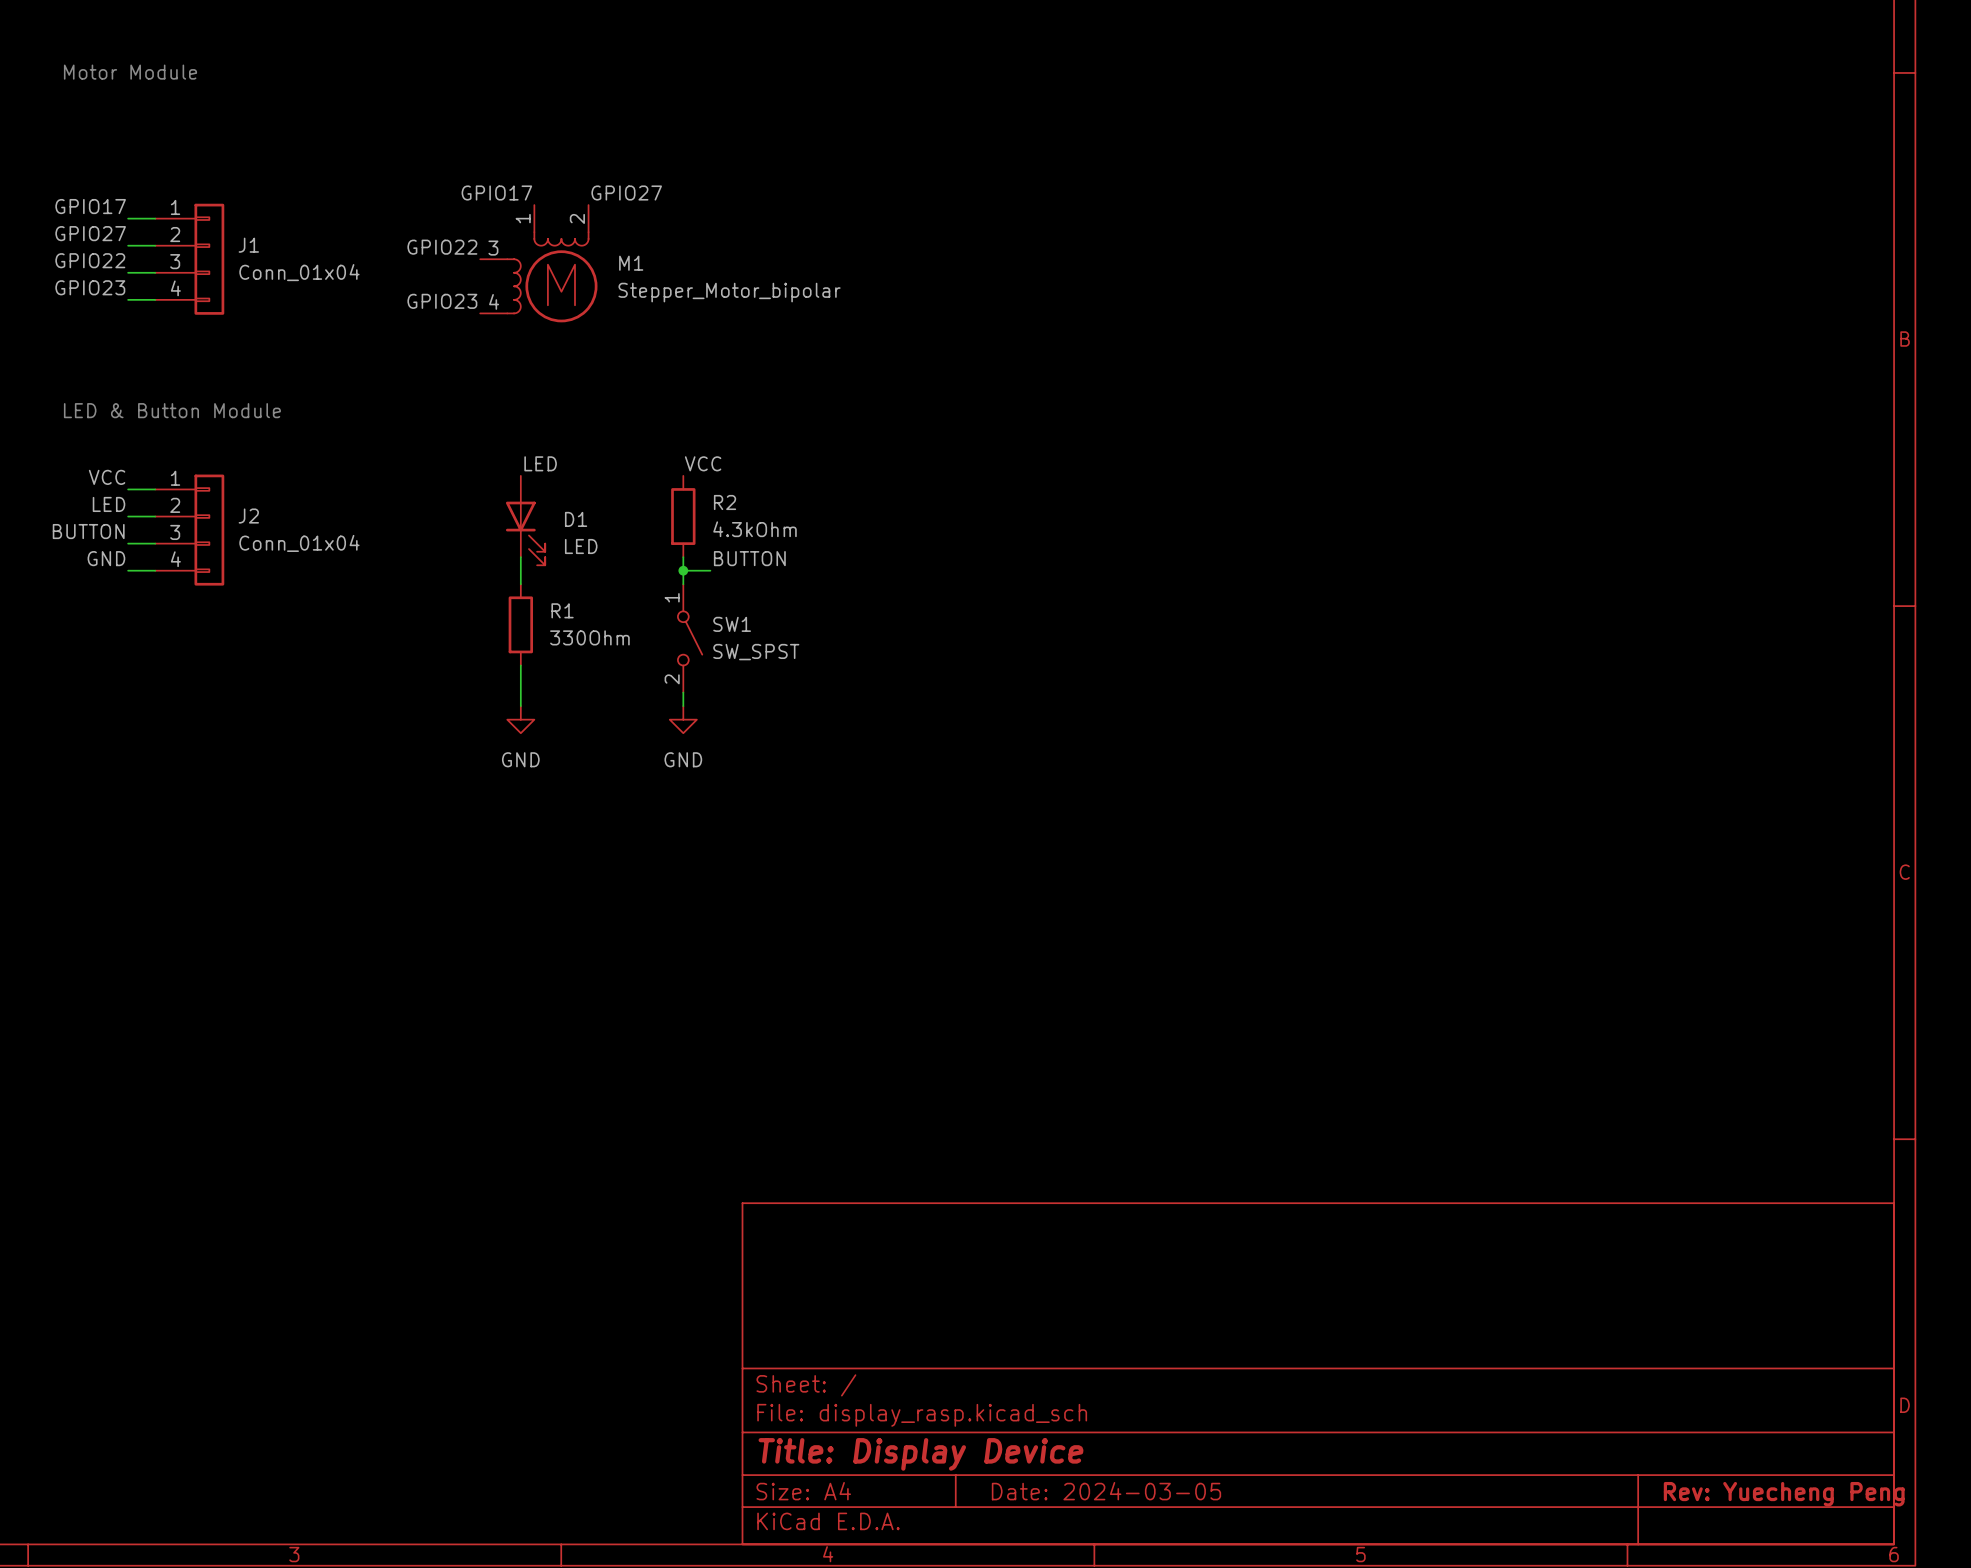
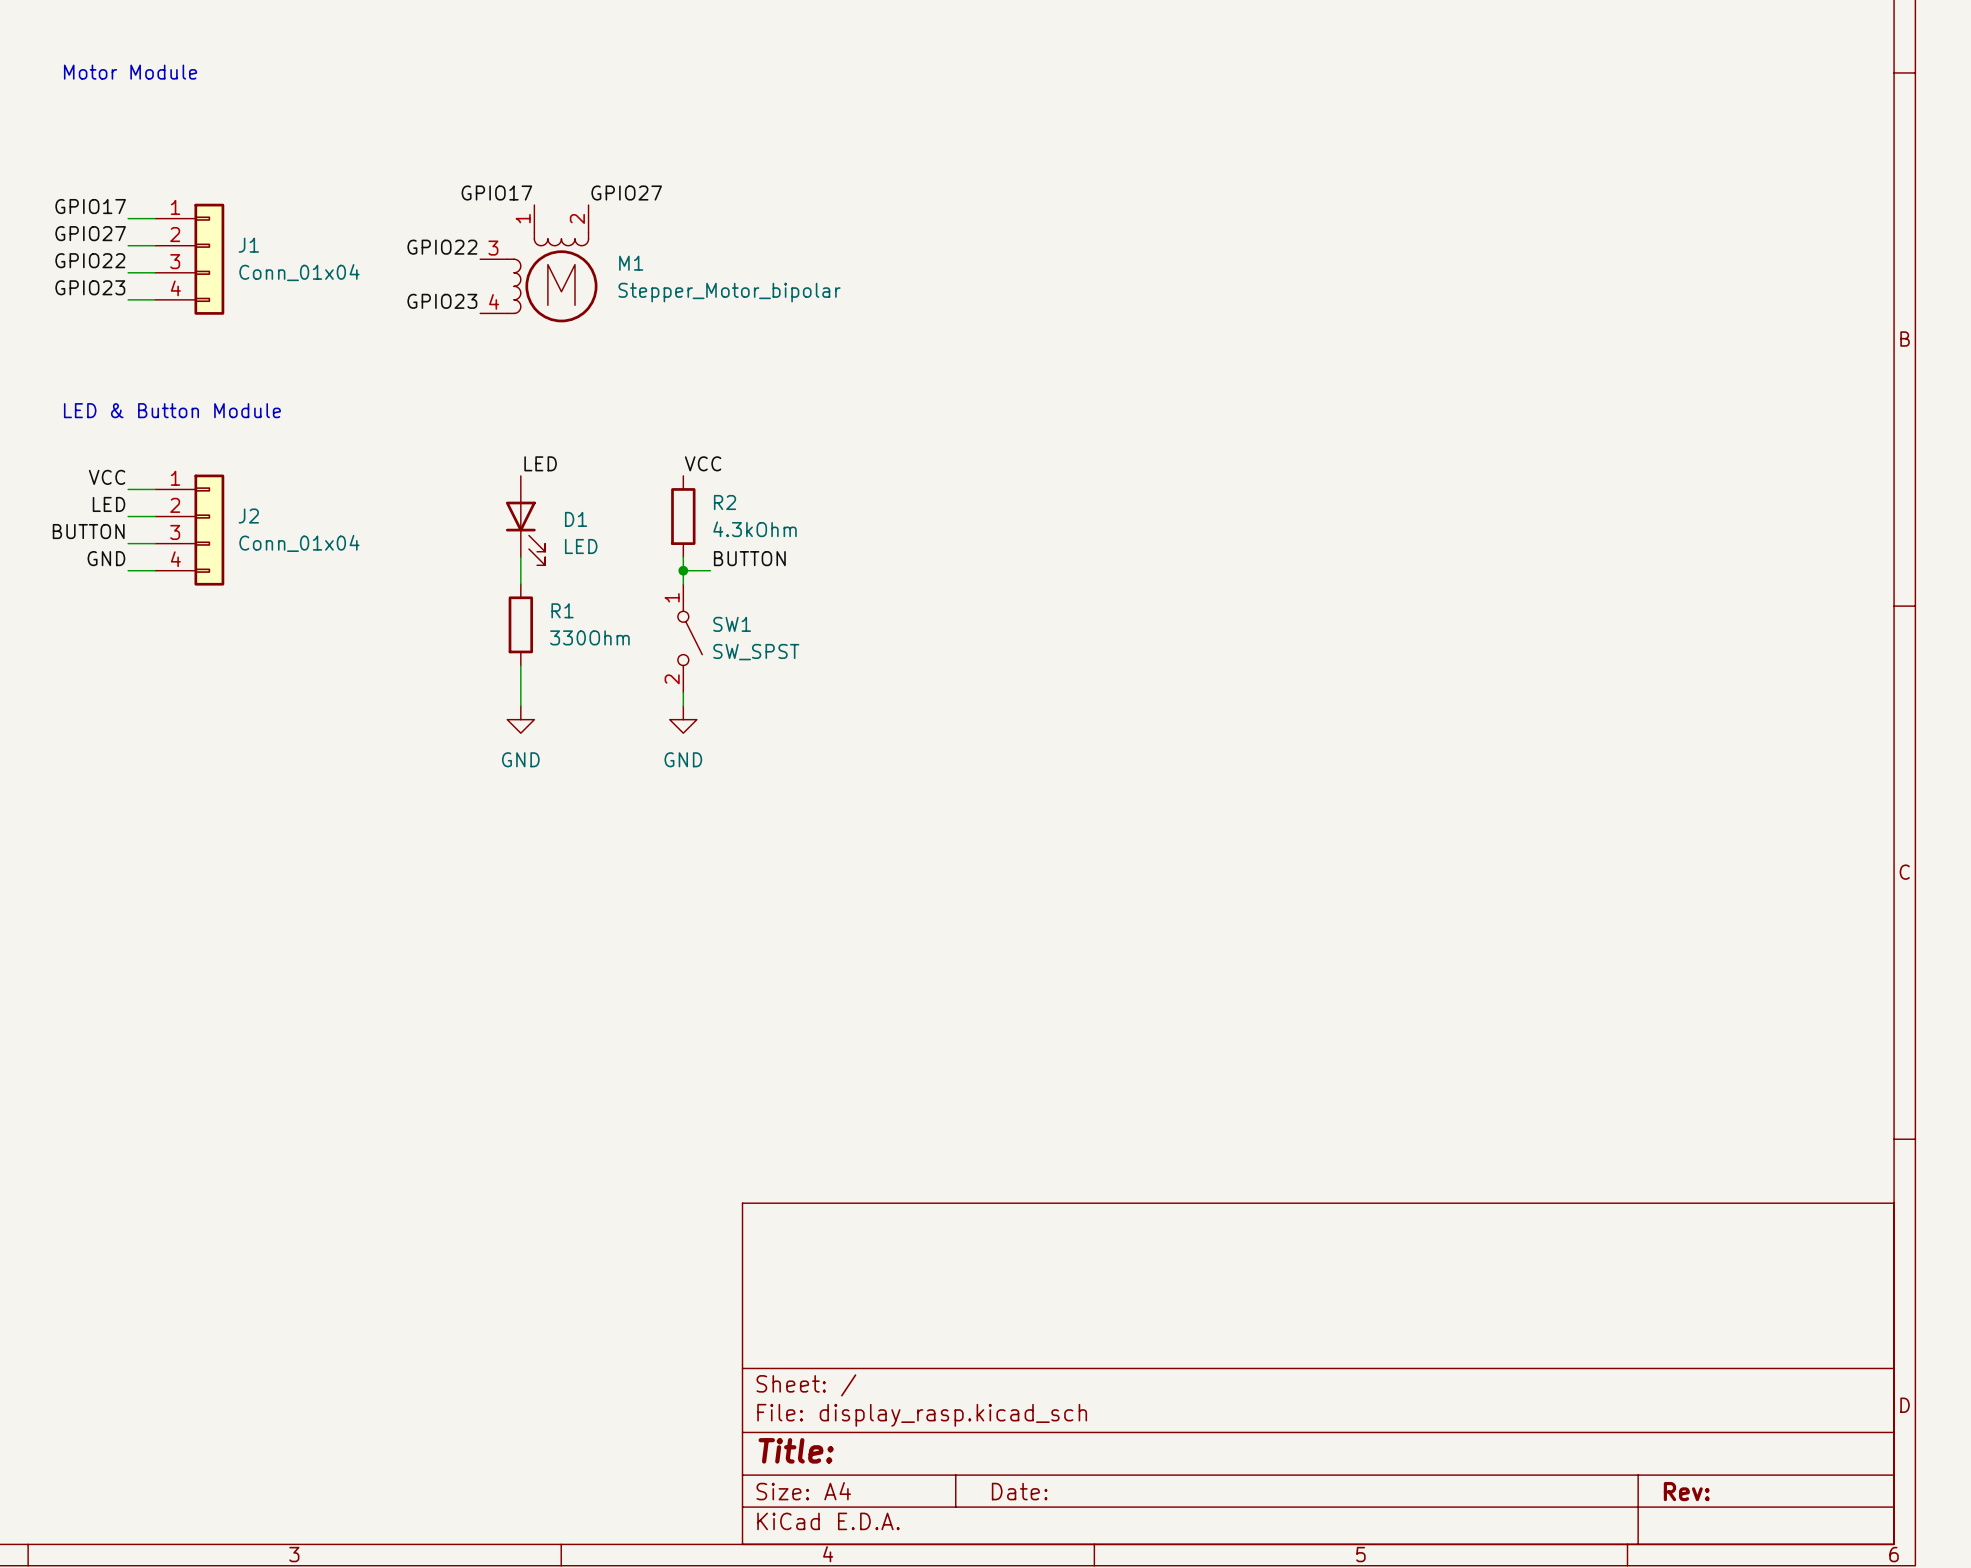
title block: Title: Display Device (920, 1454) -> Title: (796, 1450)
title block: Date: 2024-03-05 (1106, 1491) -> Date: (1019, 1491)
title block: Rev: Yuecheng Peng (1784, 1494) -> Rev: (1686, 1491)

